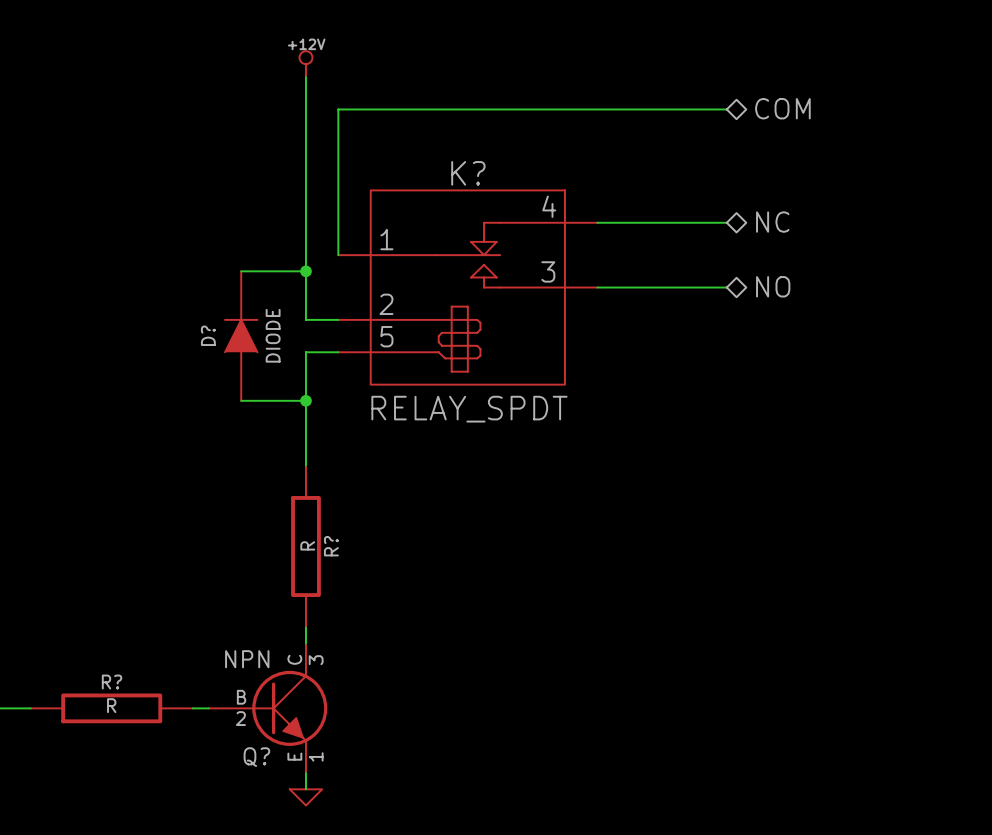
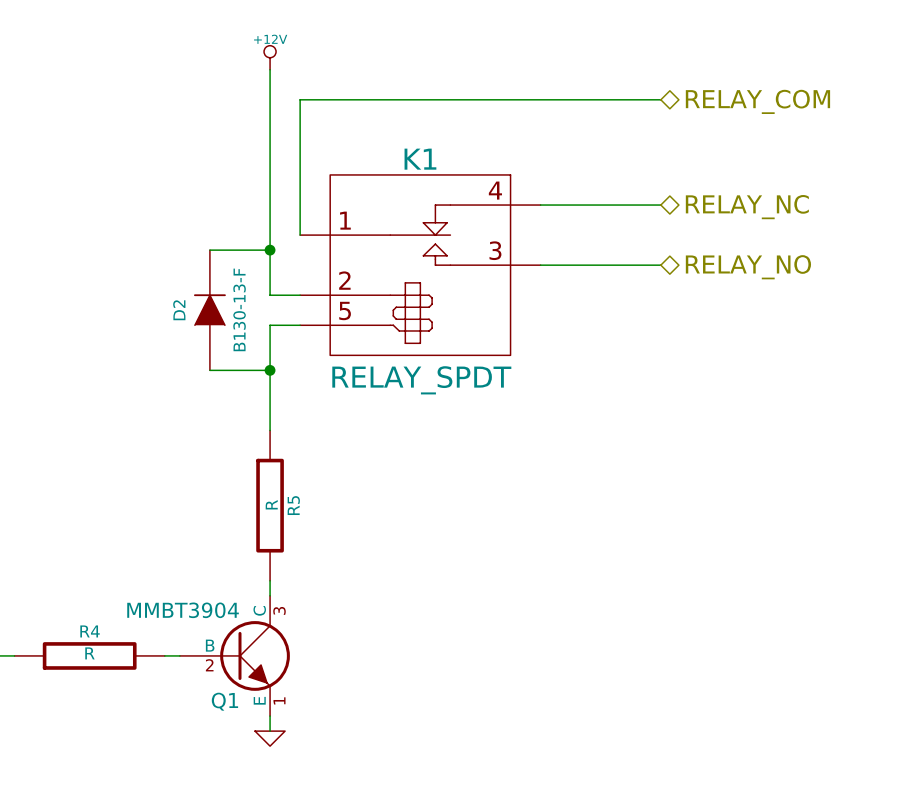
hierarchical label: COM (782, 108) -> RELAY_COM (757, 101)
K? name: K? (468, 173) -> K1 (420, 159)
hierarchical label: NC (772, 222) -> RELAY_NC (747, 207)
hierarchical label: NO (773, 286) -> RELAY_NO (748, 267)
D? name: D? (208, 335) -> D2 (179, 310)
D? value: DIODE (273, 335) -> B130-13-F (239, 309)
R? name: R? (331, 546) -> R5 (293, 505)
Q? value: NPN (247, 659) -> MMBT3904 (183, 610)
R? name: R? (112, 682) -> R4 (90, 631)
Q? name: Q? (256, 757) -> Q1 (224, 701)

